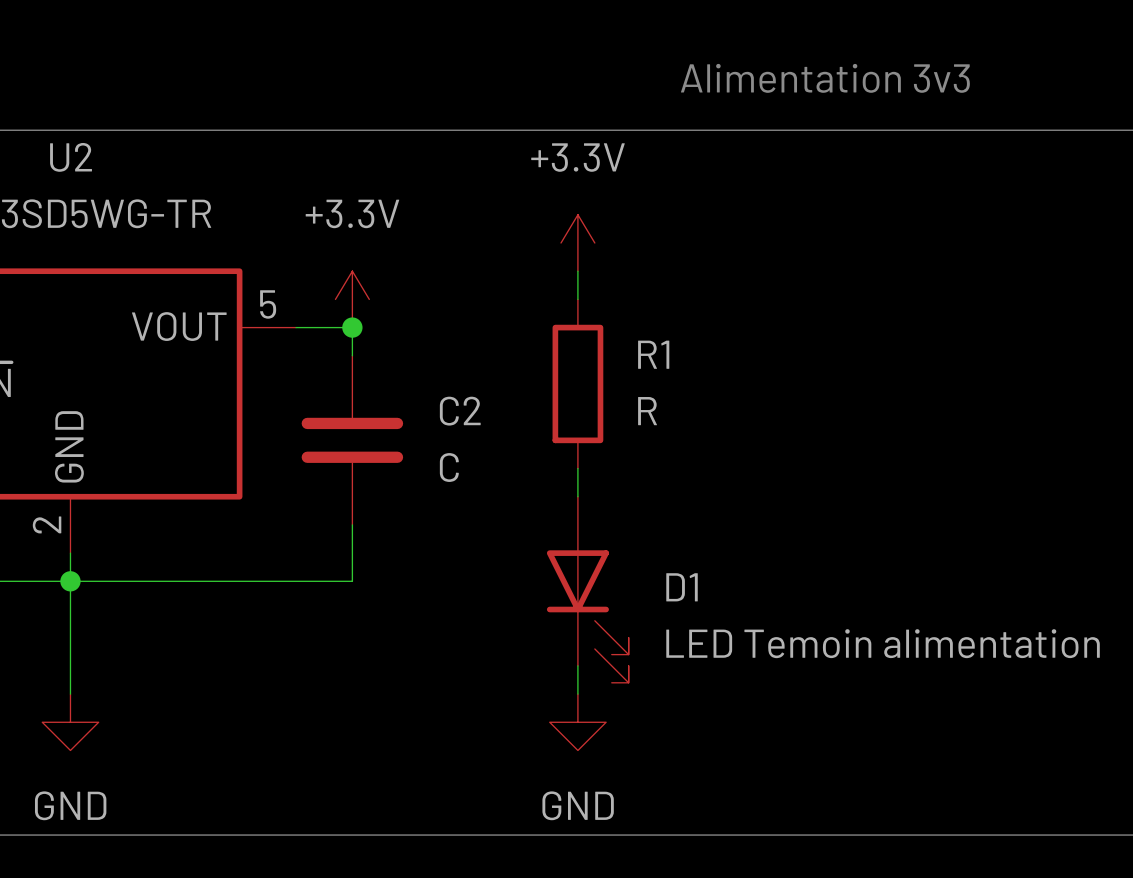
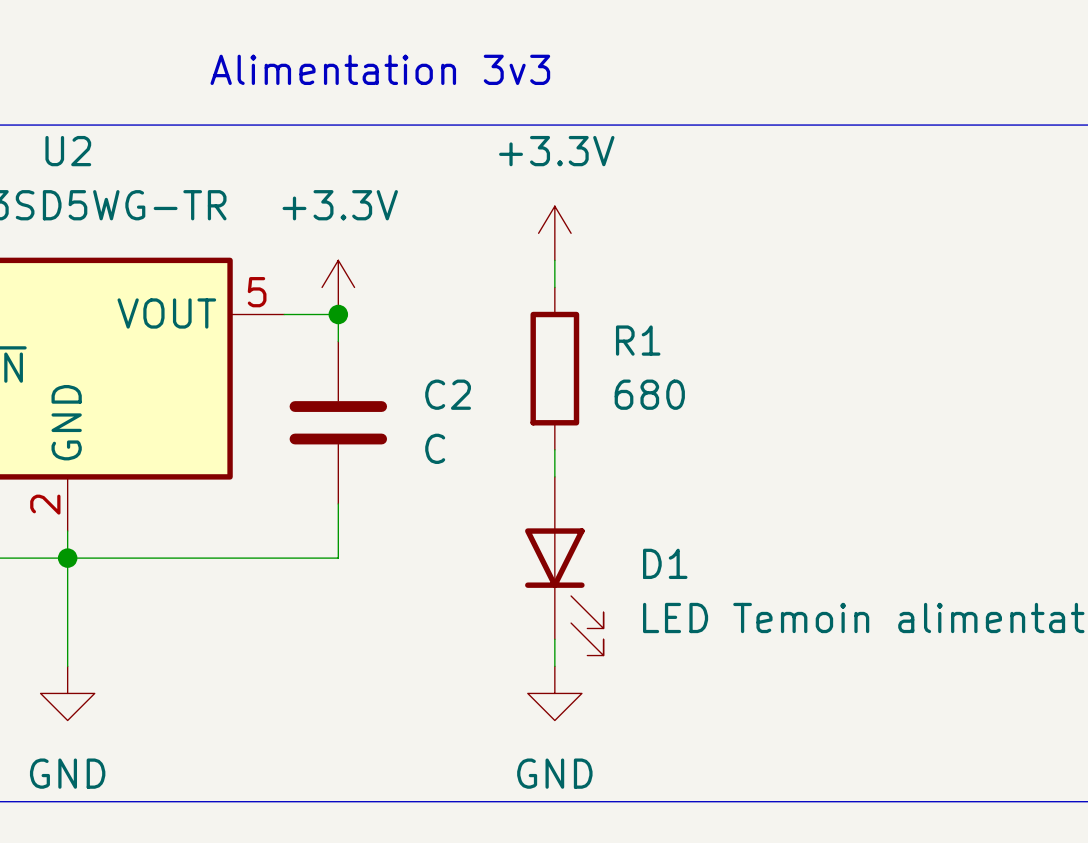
text position: Alimentation 3v3 (825, 78) -> Alimentation 3v3 (380, 69)
R1 value: R (647, 411) -> 680 (649, 394)

